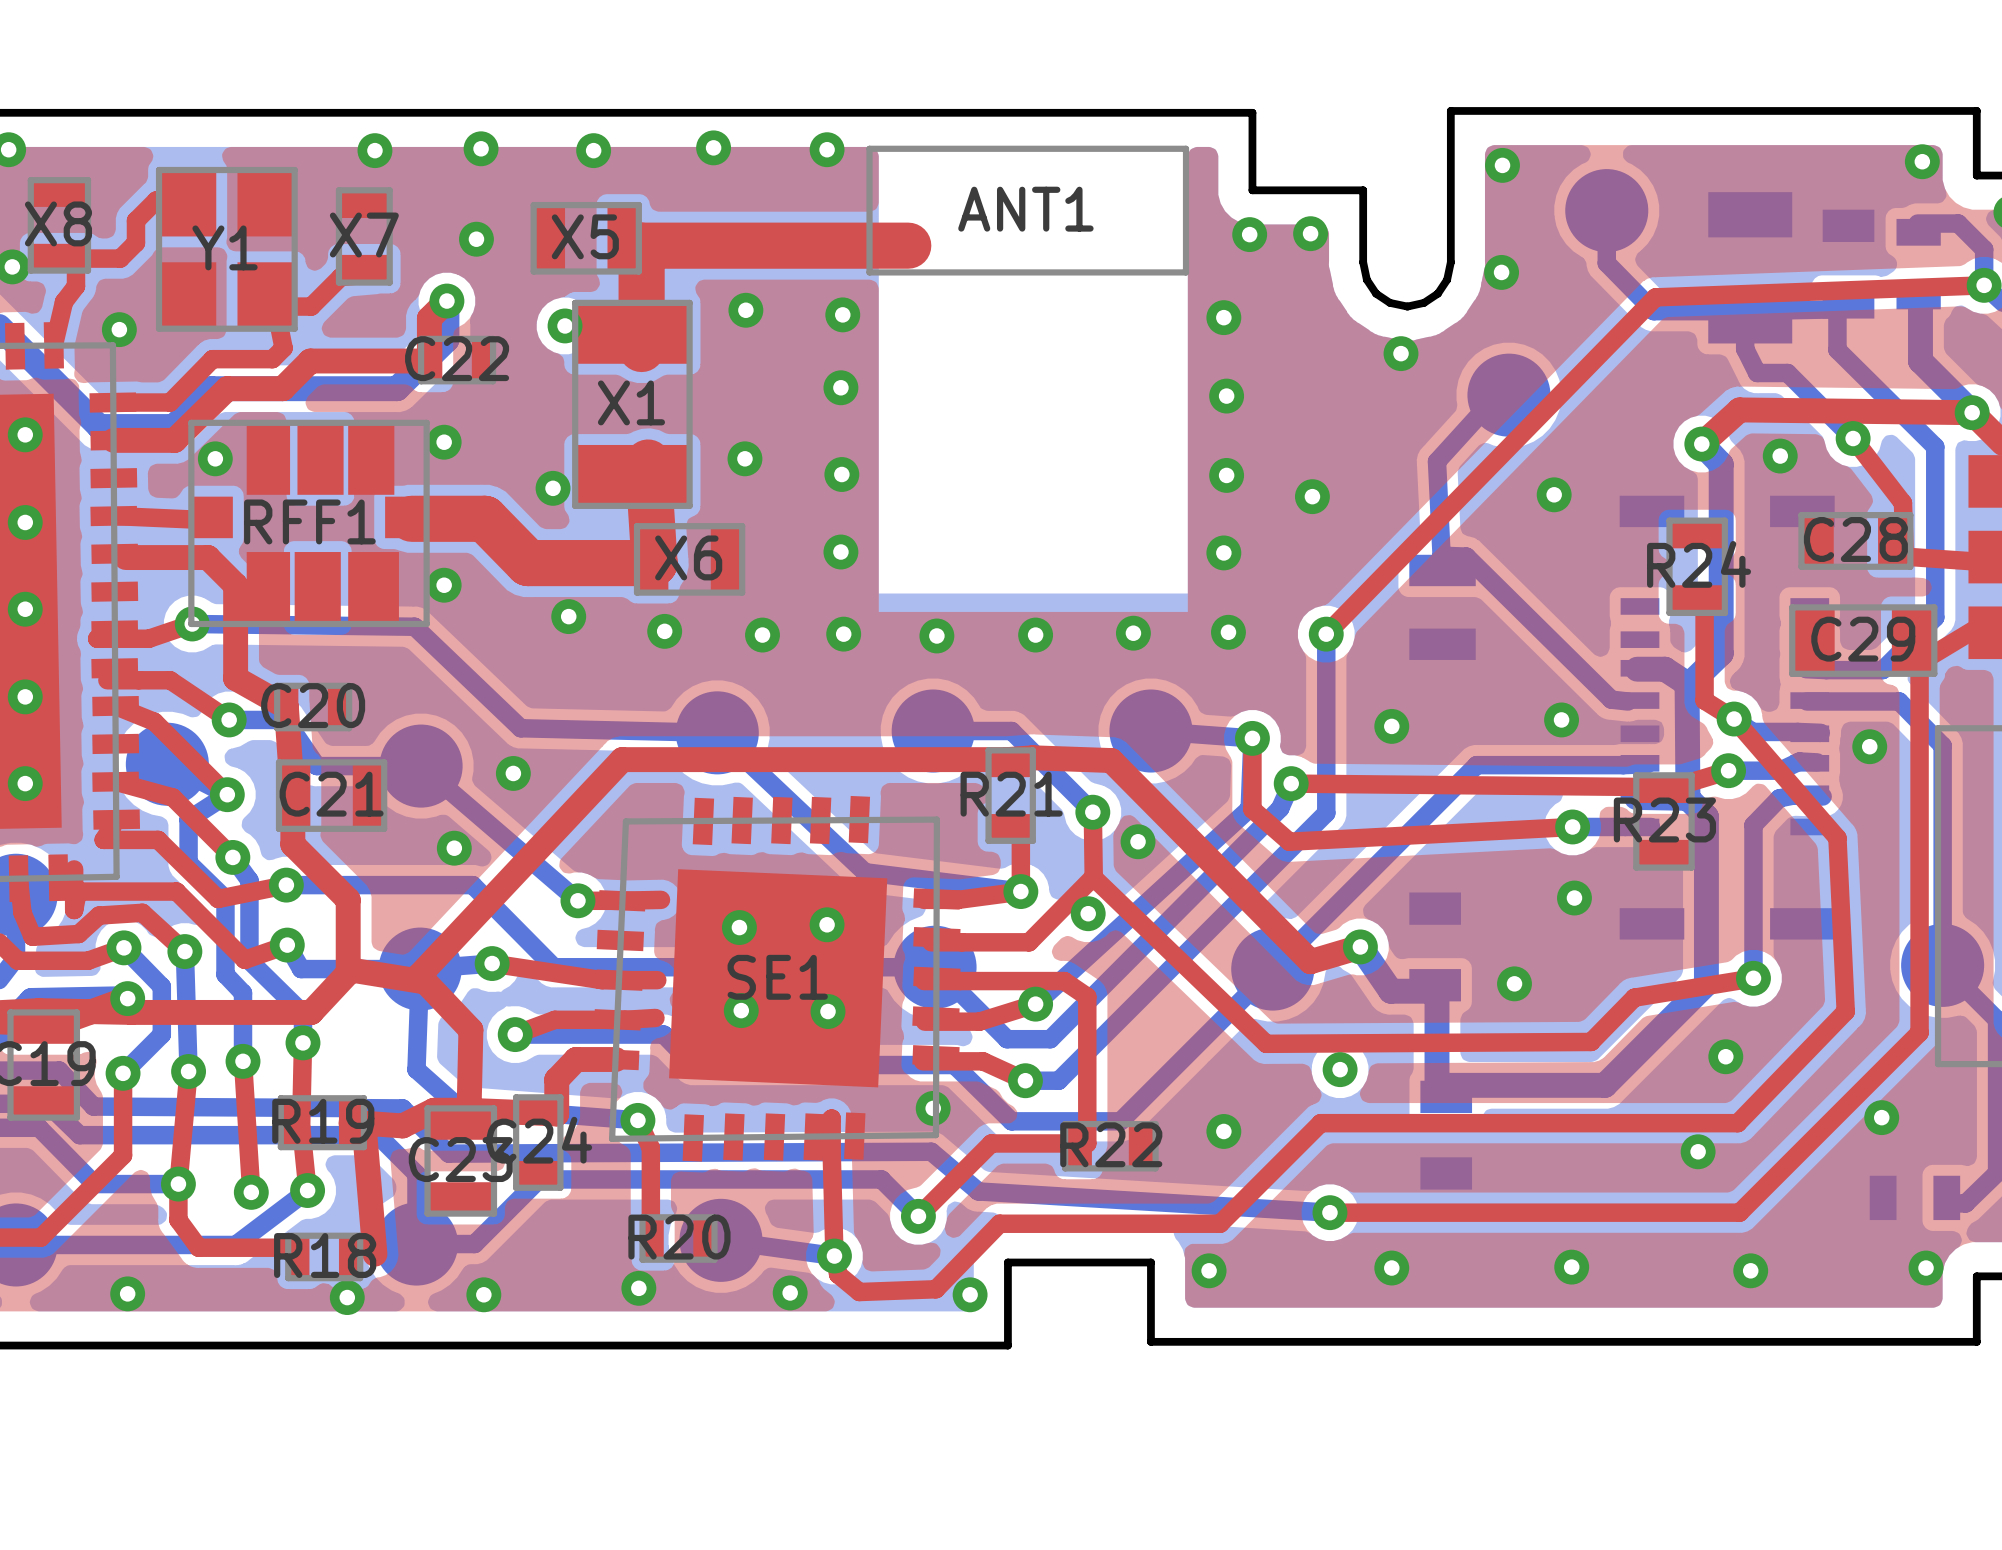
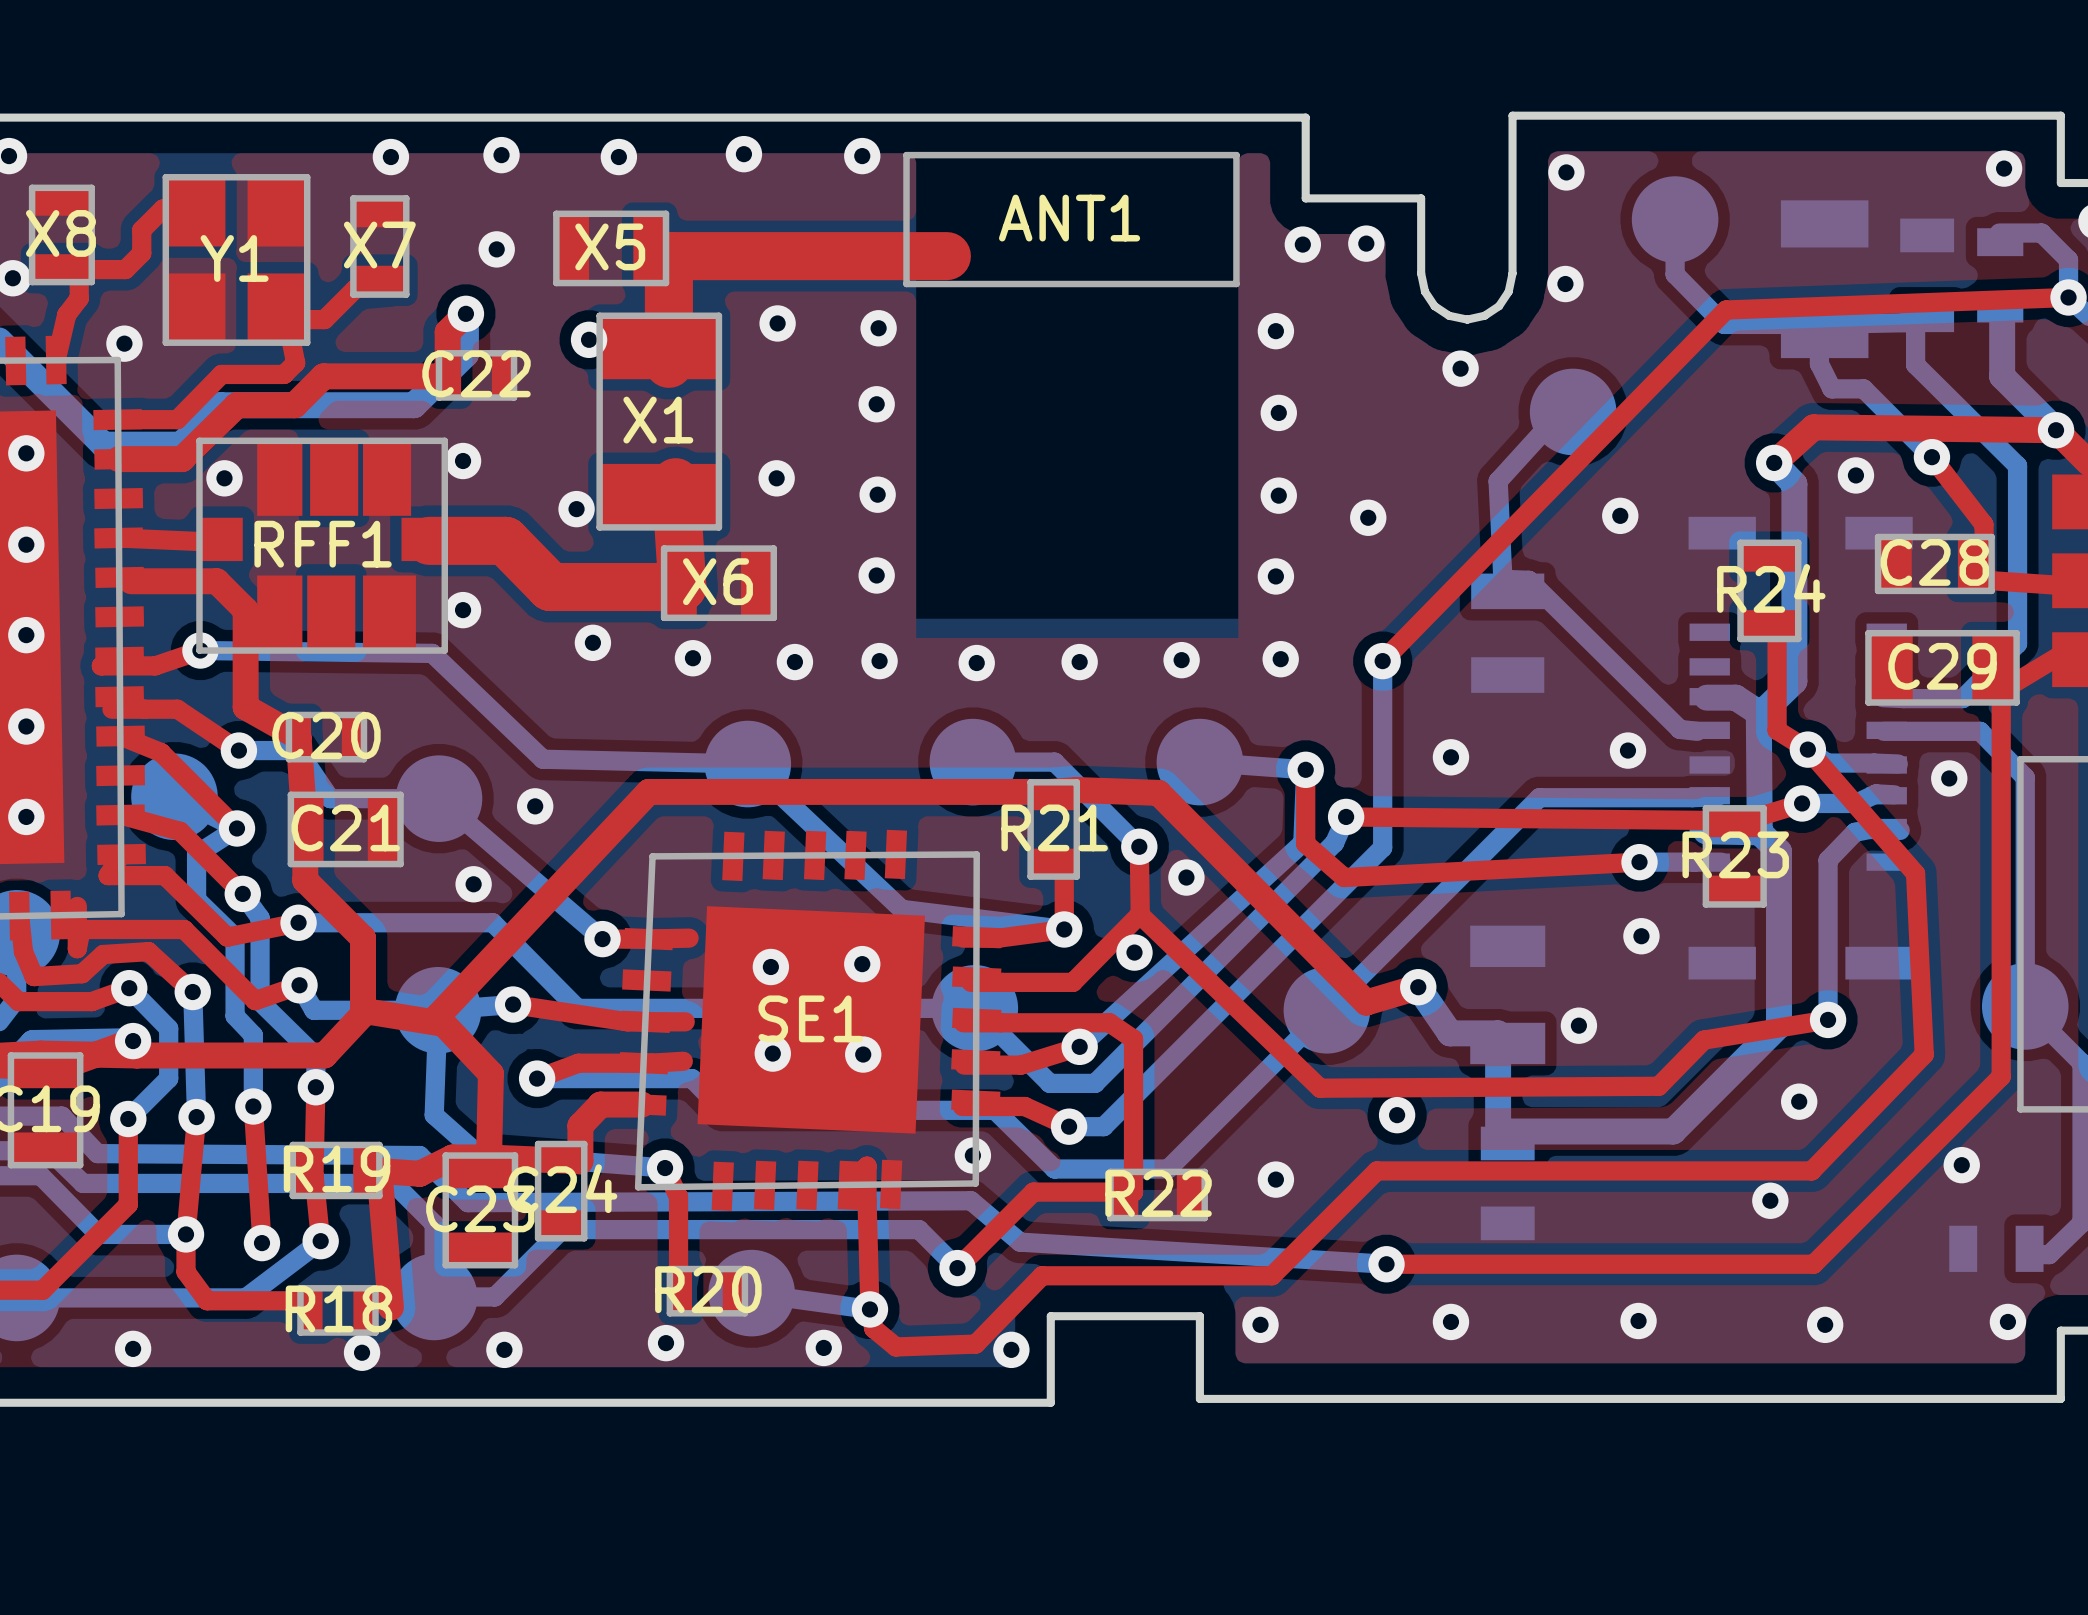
part footprint: [1409, 554, 1476, 660] -> [1471, 573, 1545, 693]
part footprint: [1409, 892, 1461, 1002] -> [1470, 925, 1546, 1065]

